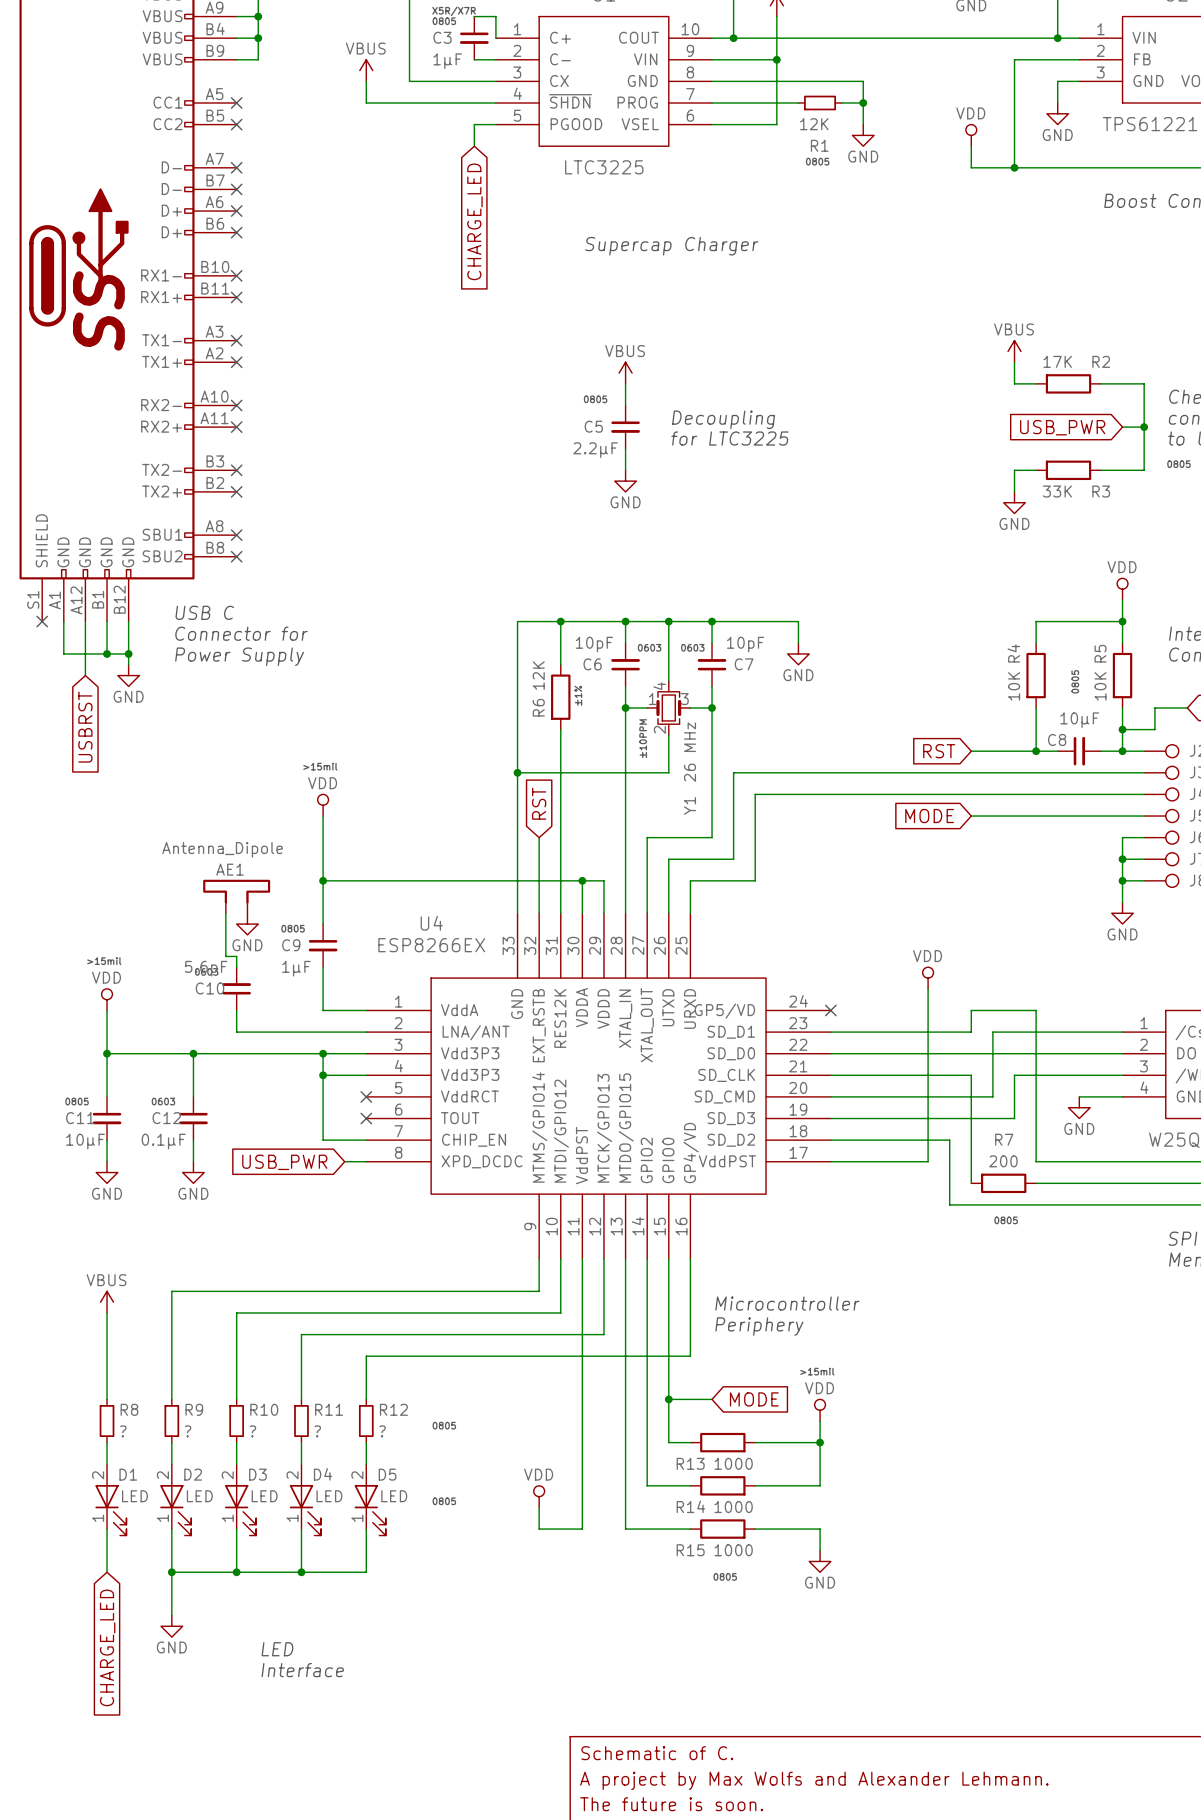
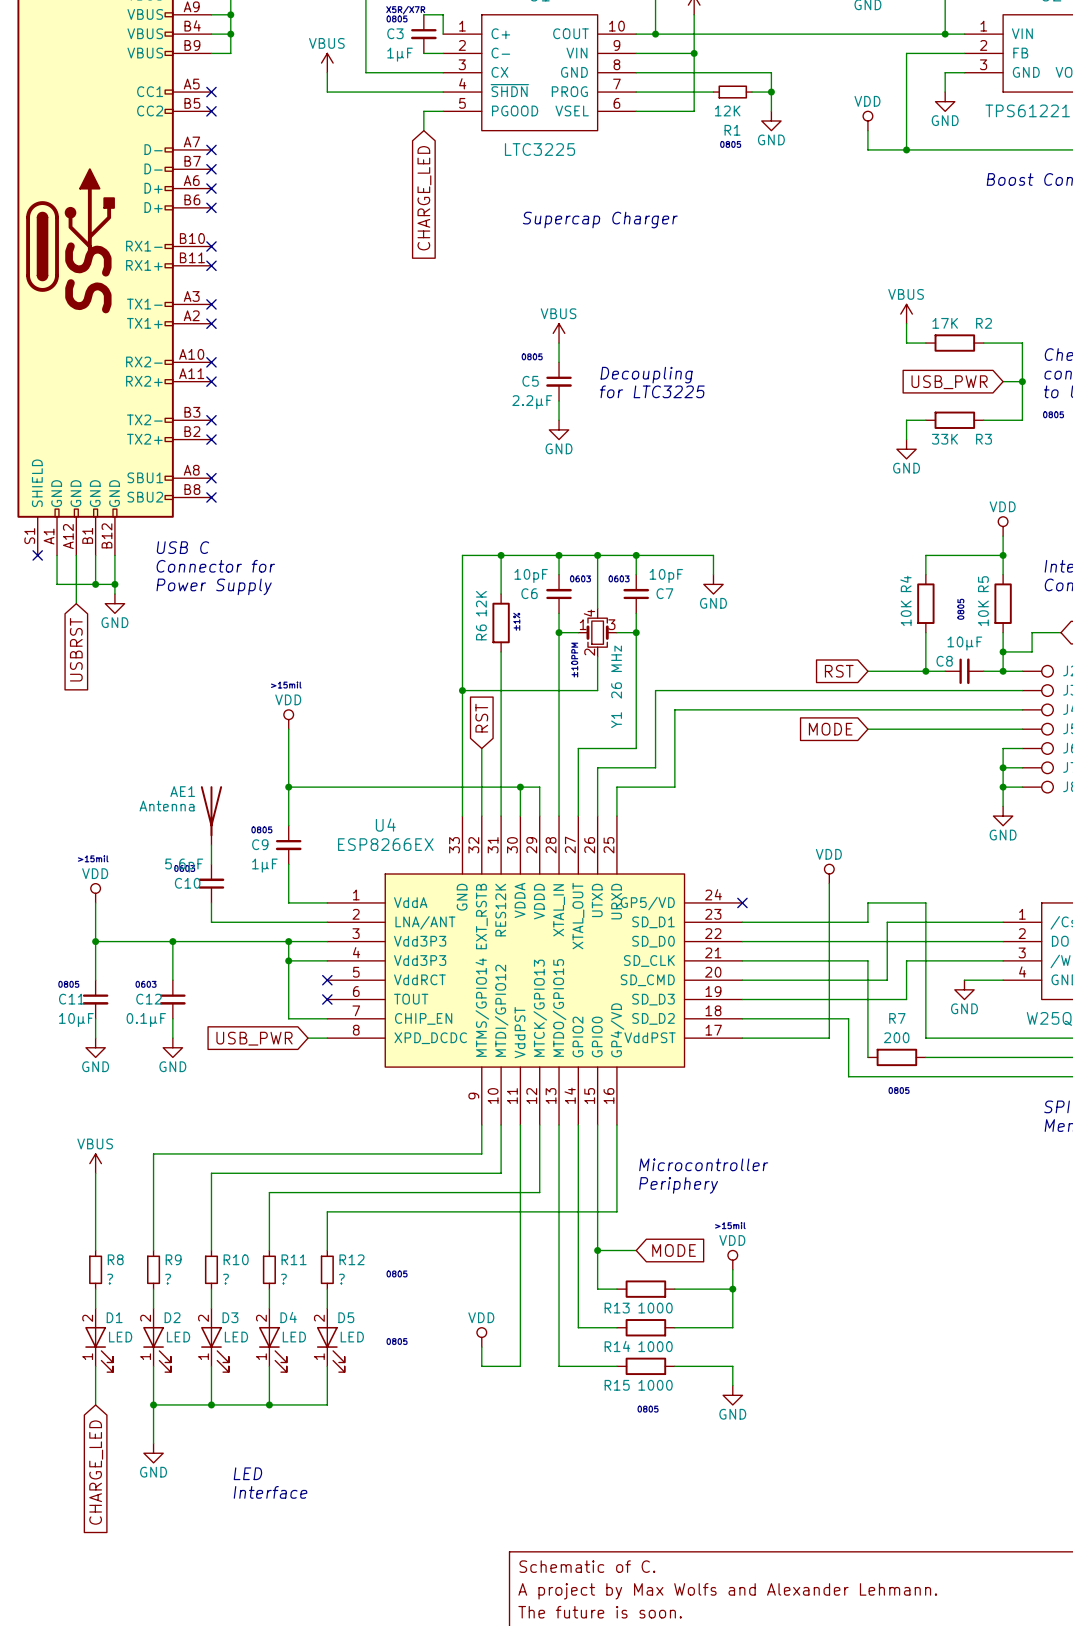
AE1 value: Antenna_Dipole (222, 849) -> Antenna (167, 806)
AE1 name position: AE1 (230, 869) -> AE1 (182, 791)
AE1 symbol: [203, 879, 271, 914] -> [200, 786, 223, 846]
wire: (225, 913) (225, 956) (236, 956) -> (211, 845) (211, 854)
power symbol: GND (247, 924) -> none

